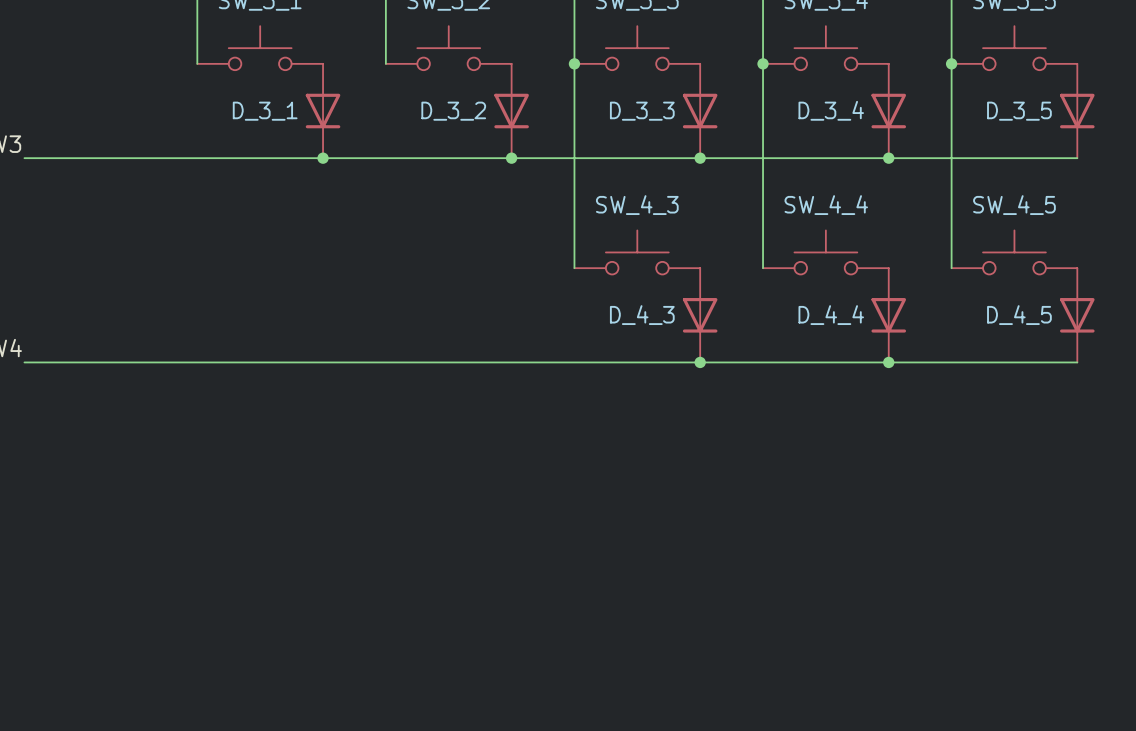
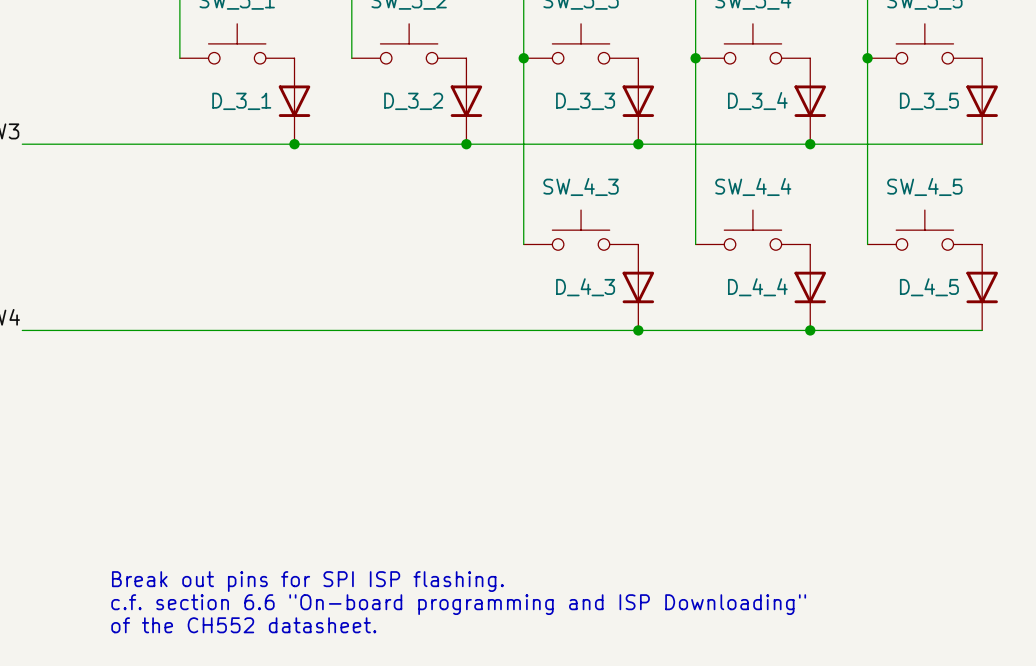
text: none -> Break out pins for SPI ISP flashing. (307, 581)
text: none -> c.f. section 6.6 "On-board programming and ISP Downloading" (458, 604)
text: none -> of the CH552 datasheet. (243, 625)

